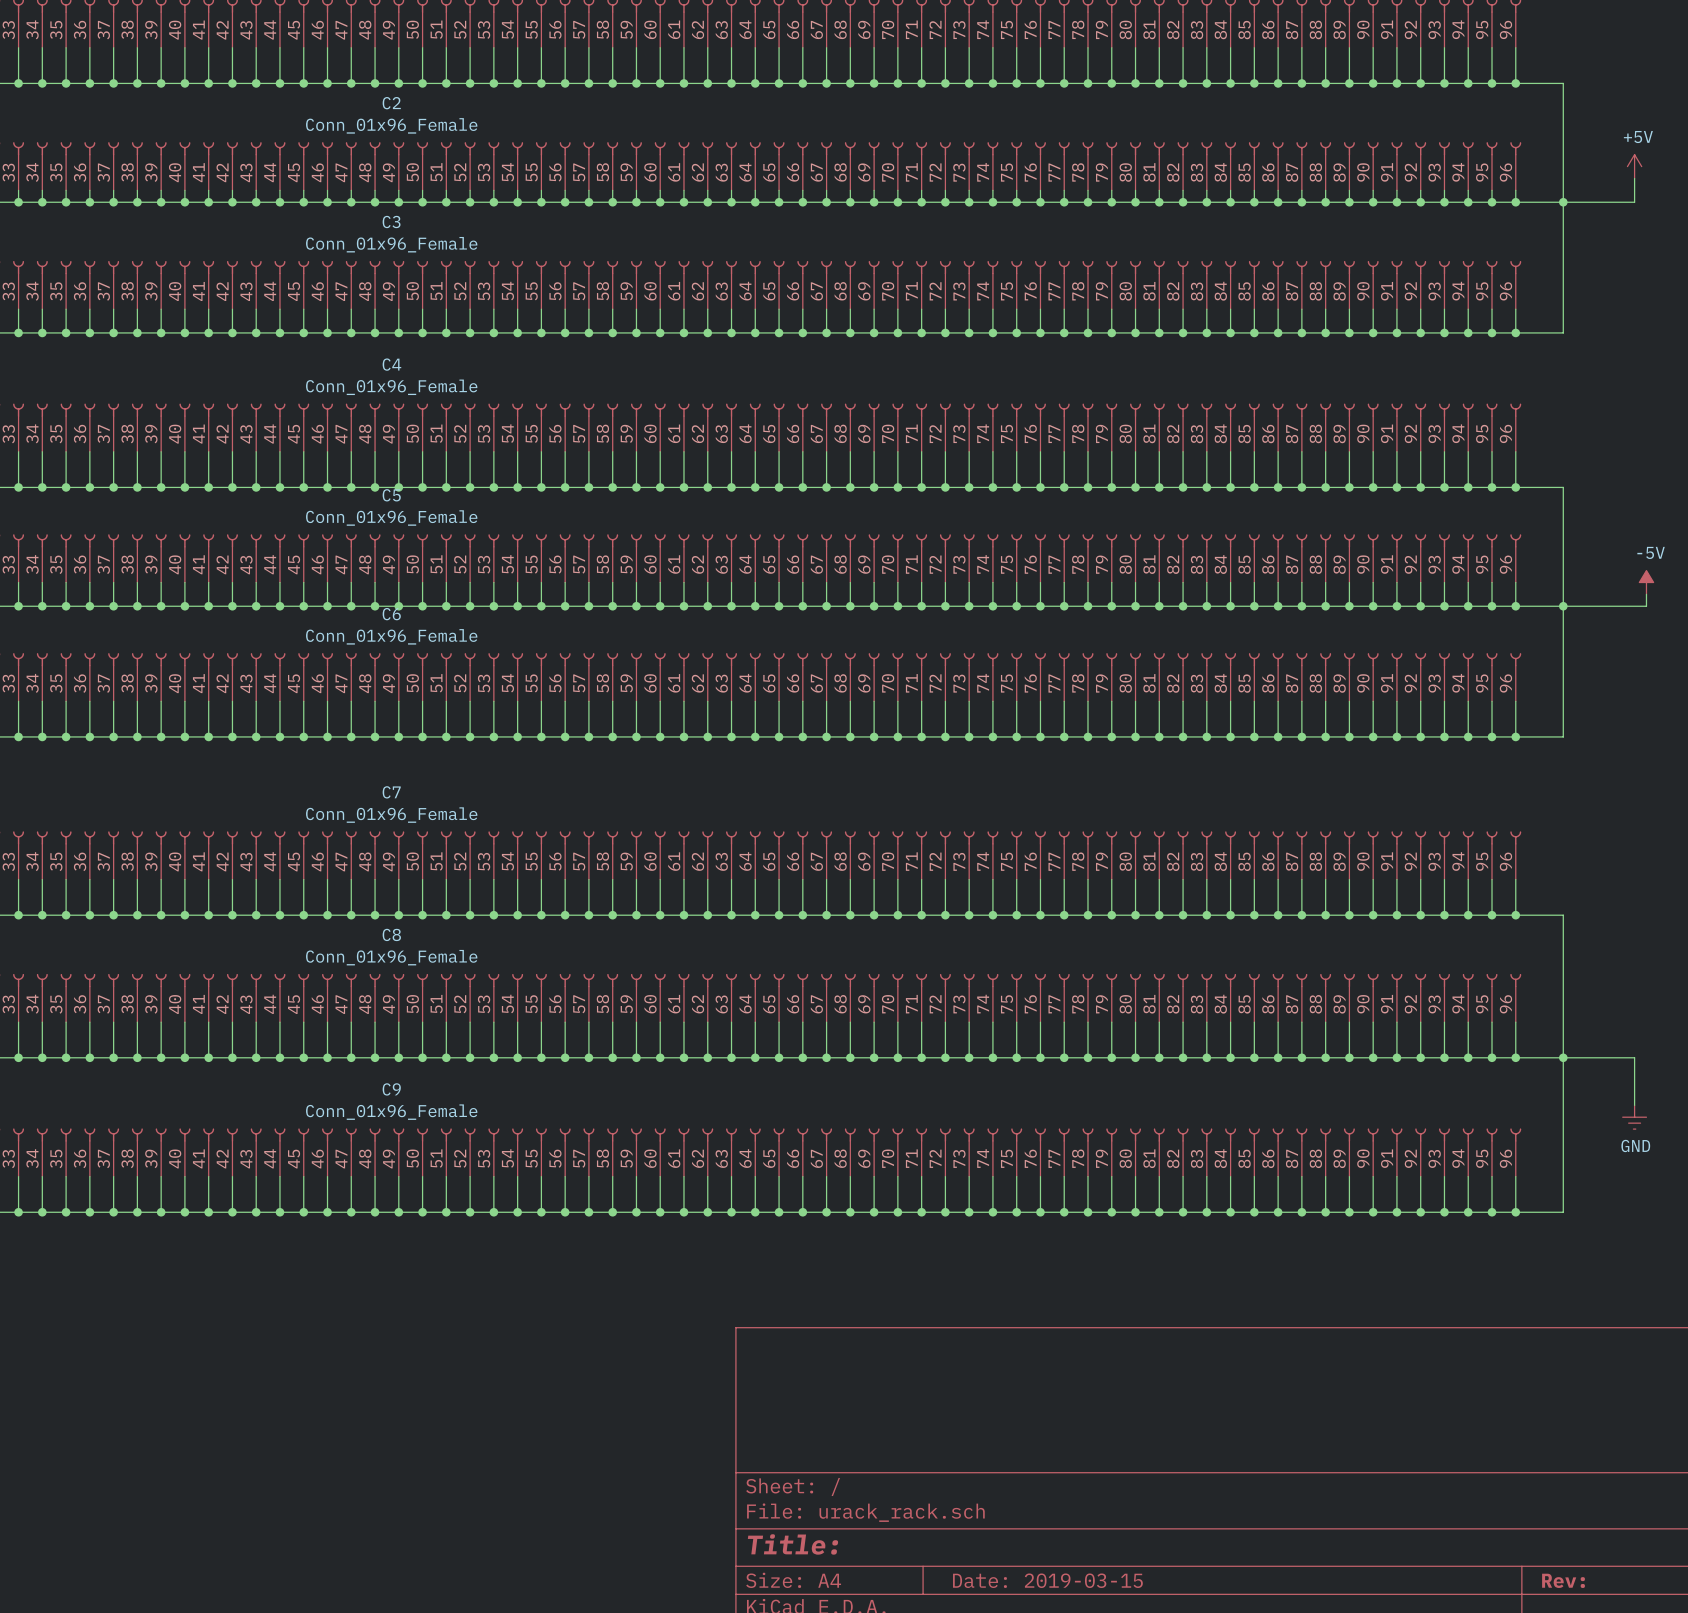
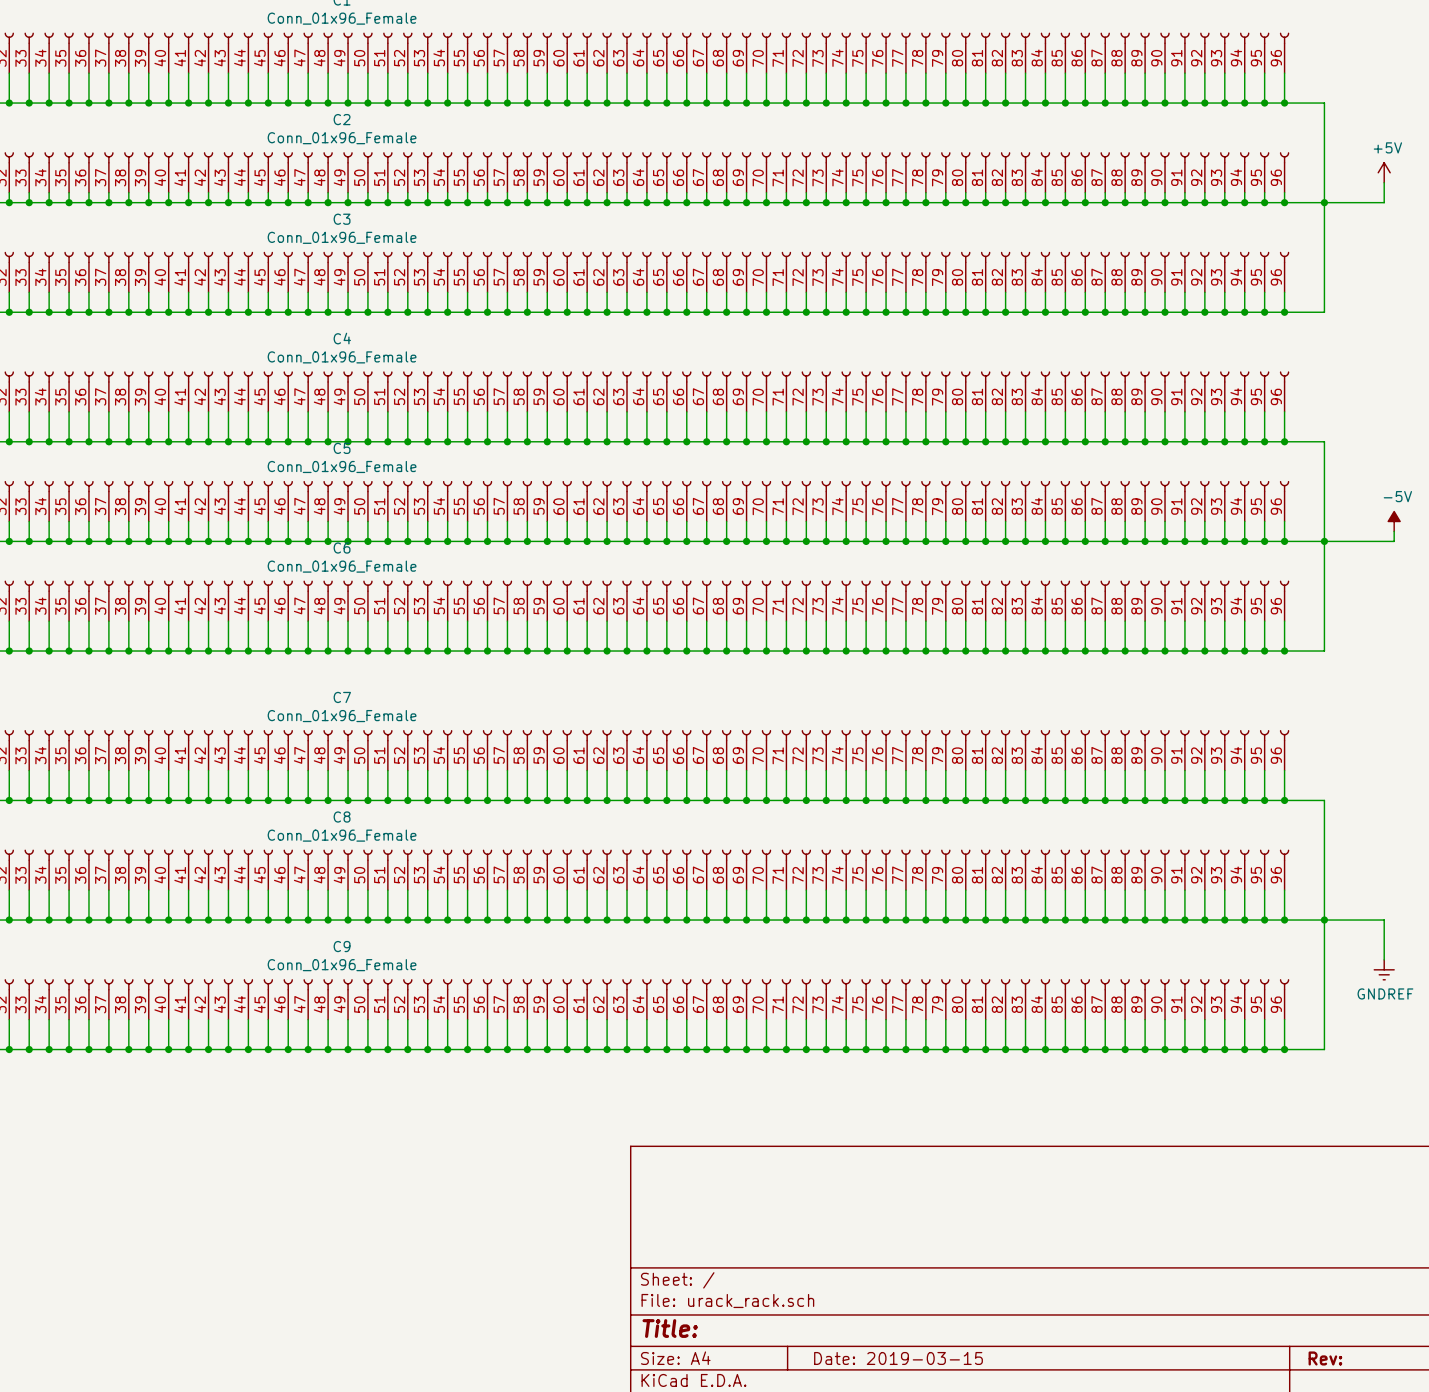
power symbol: GND (1634, 1117) -> GNDREF (1384, 969)

